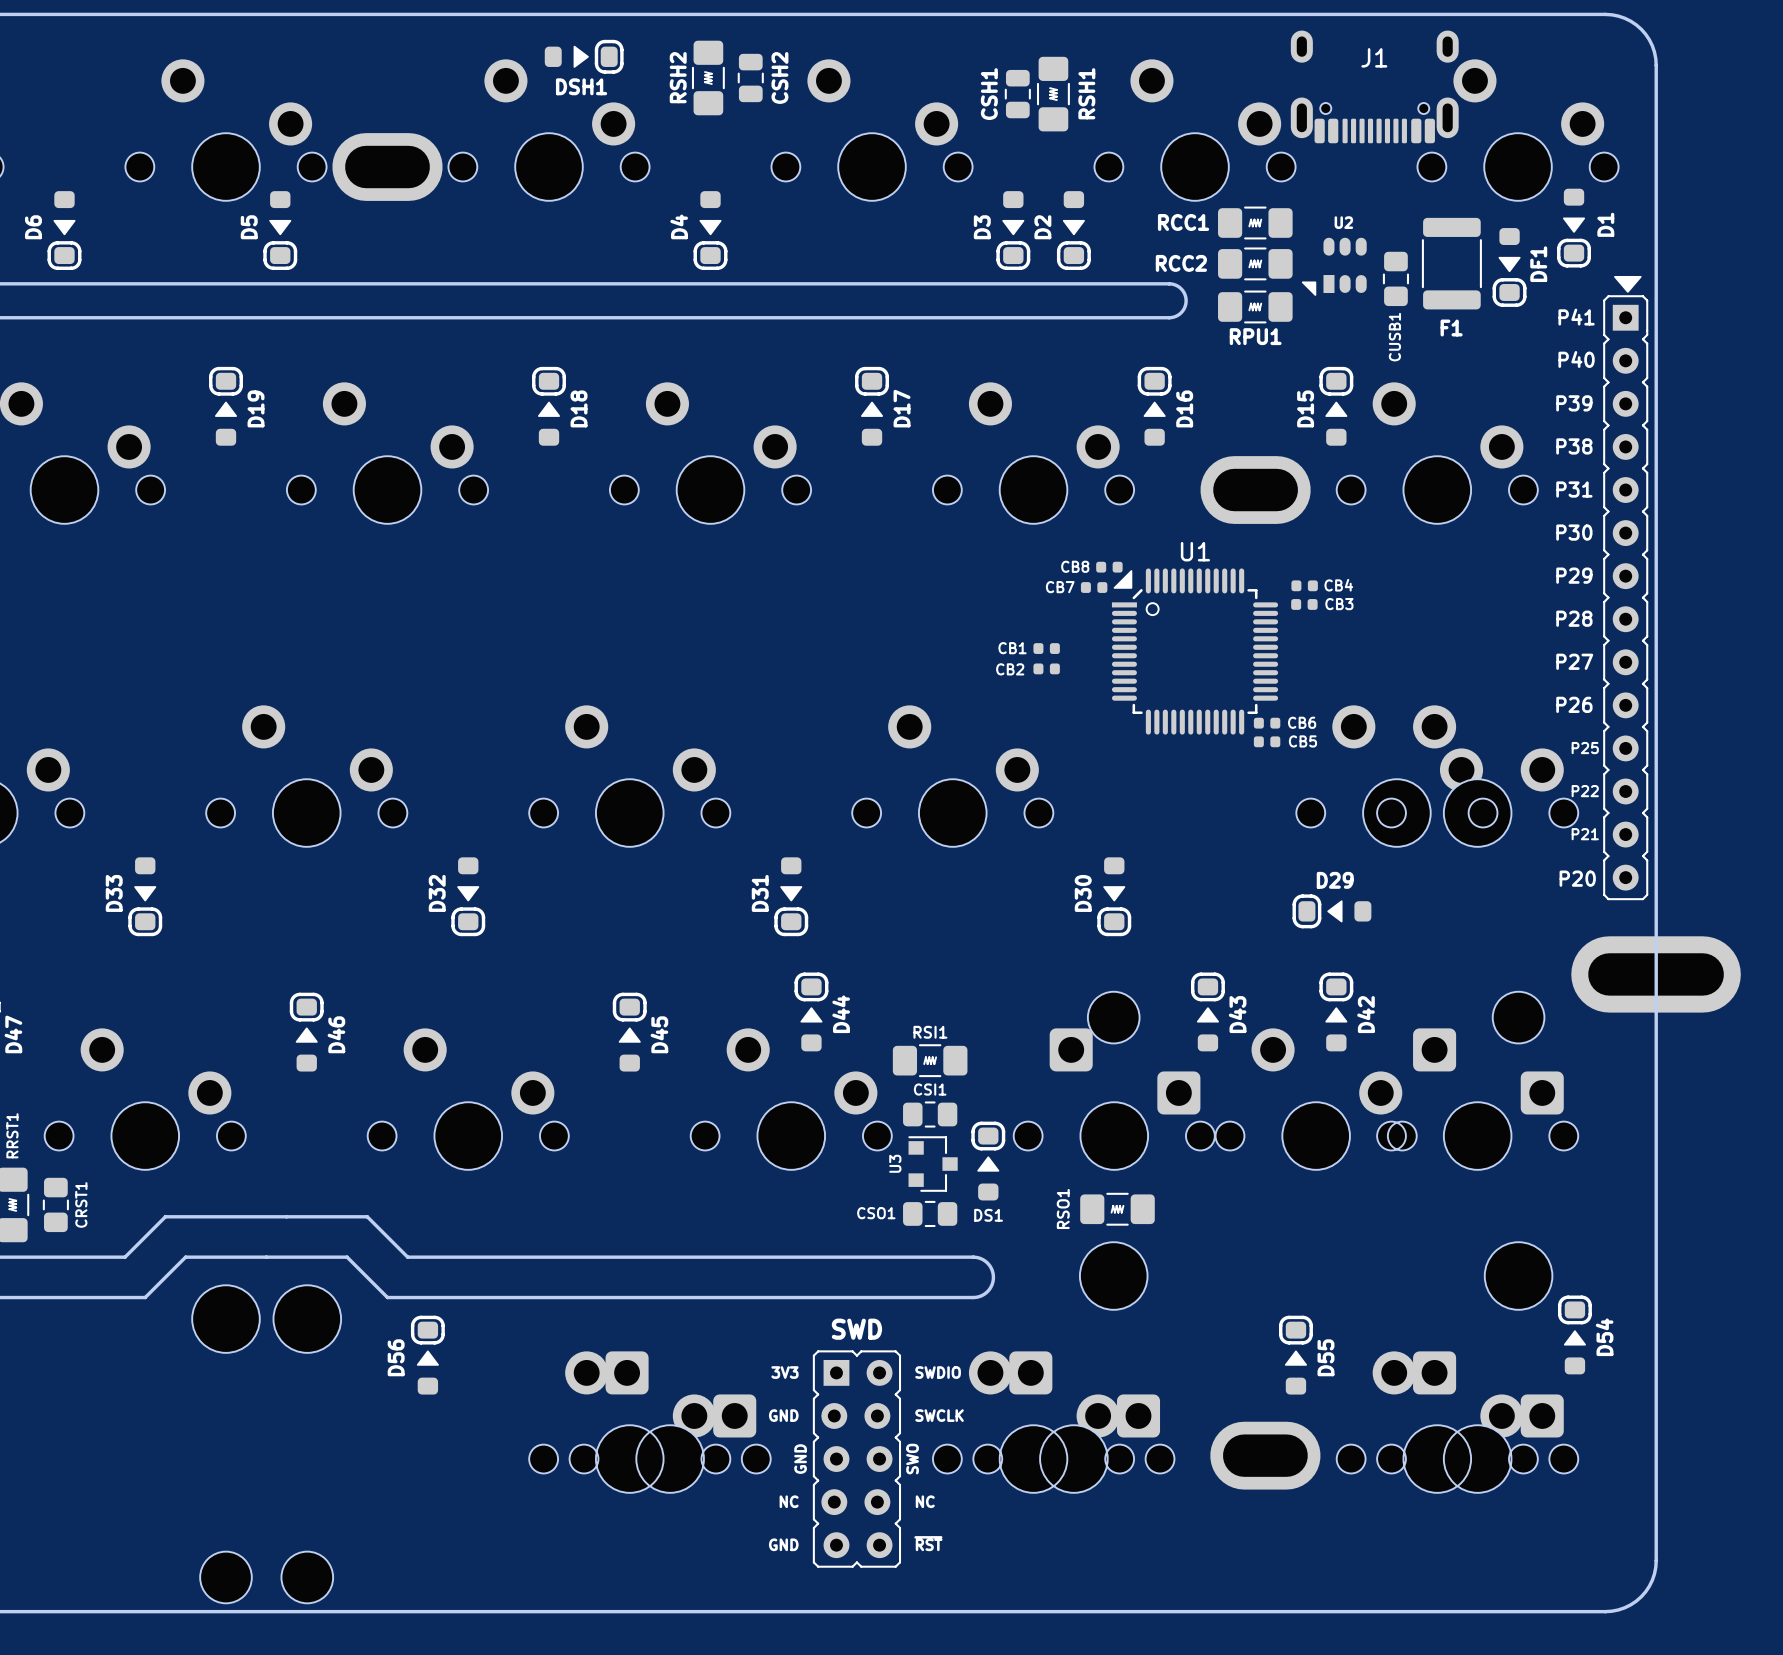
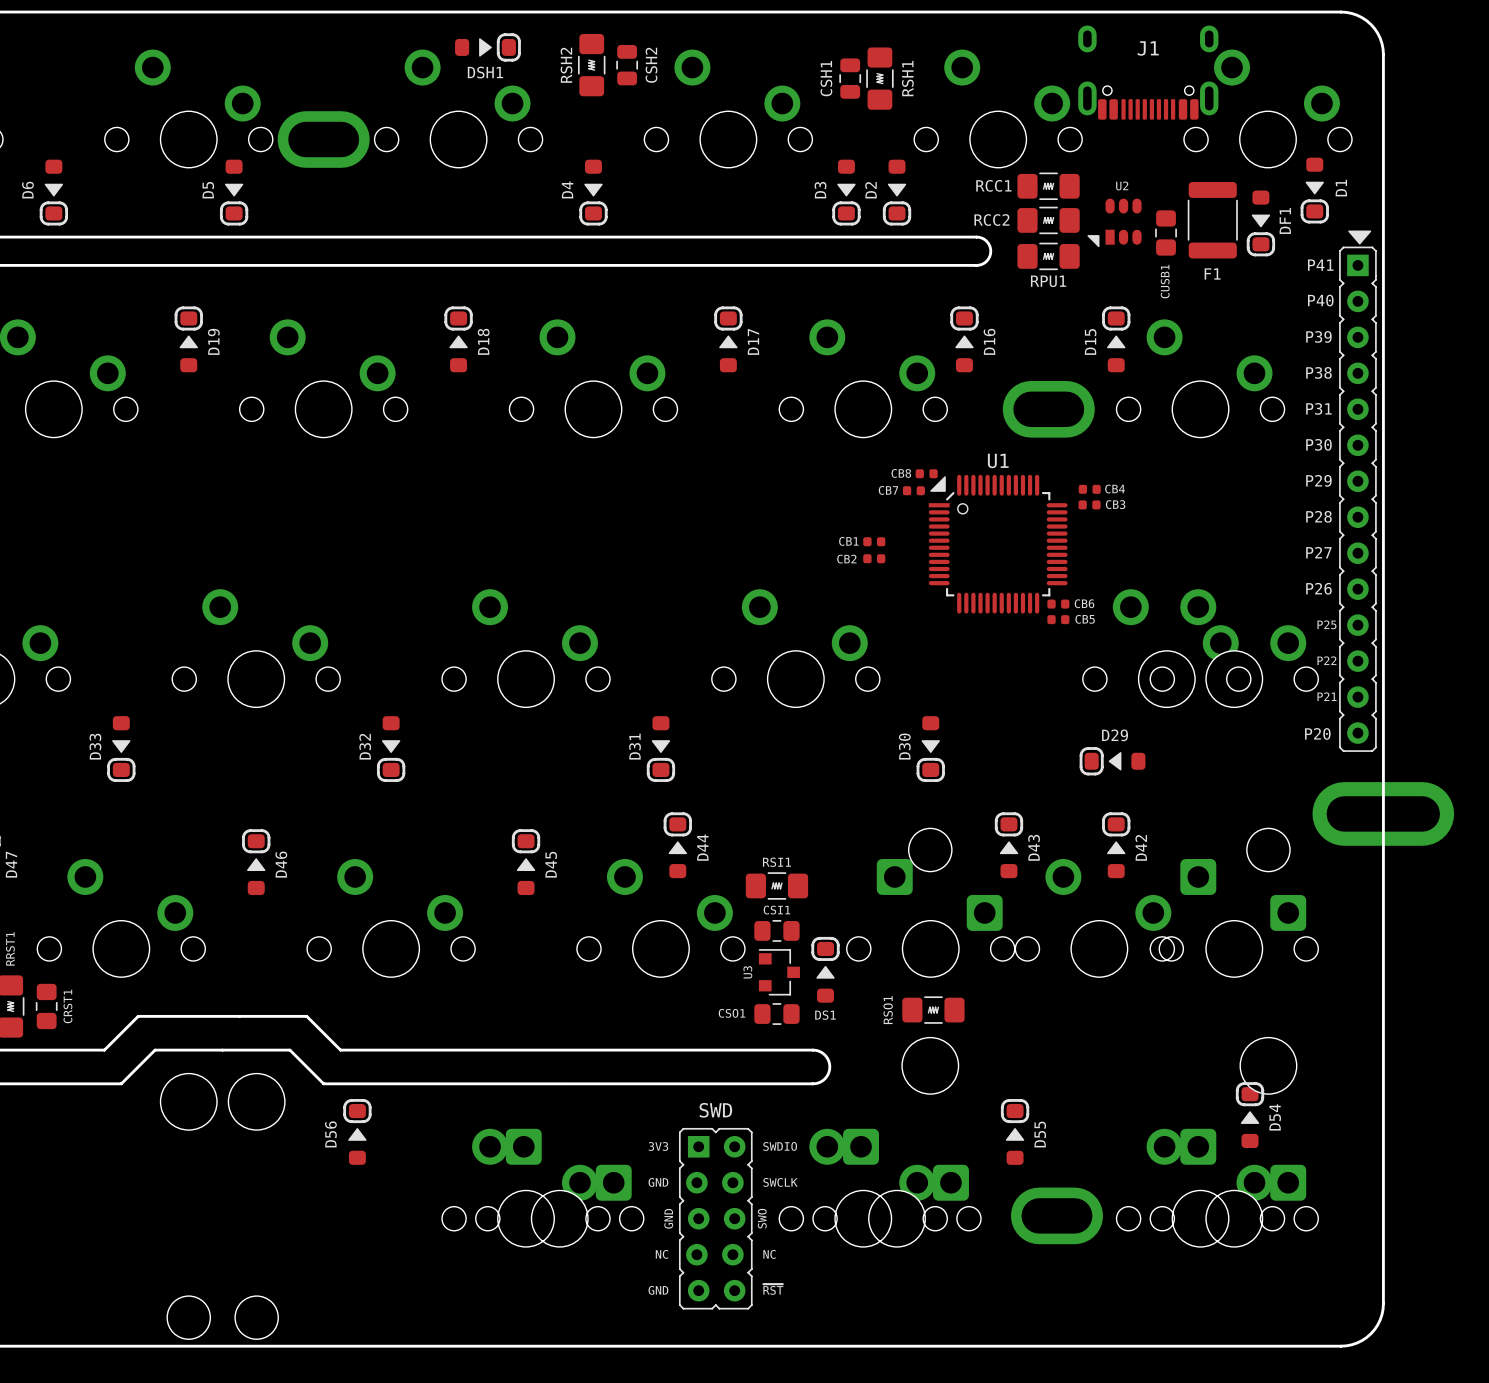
D54 position: (1574, 1334) -> (1250, 1115)
D55 position: (1295, 1355) -> (1015, 1131)

